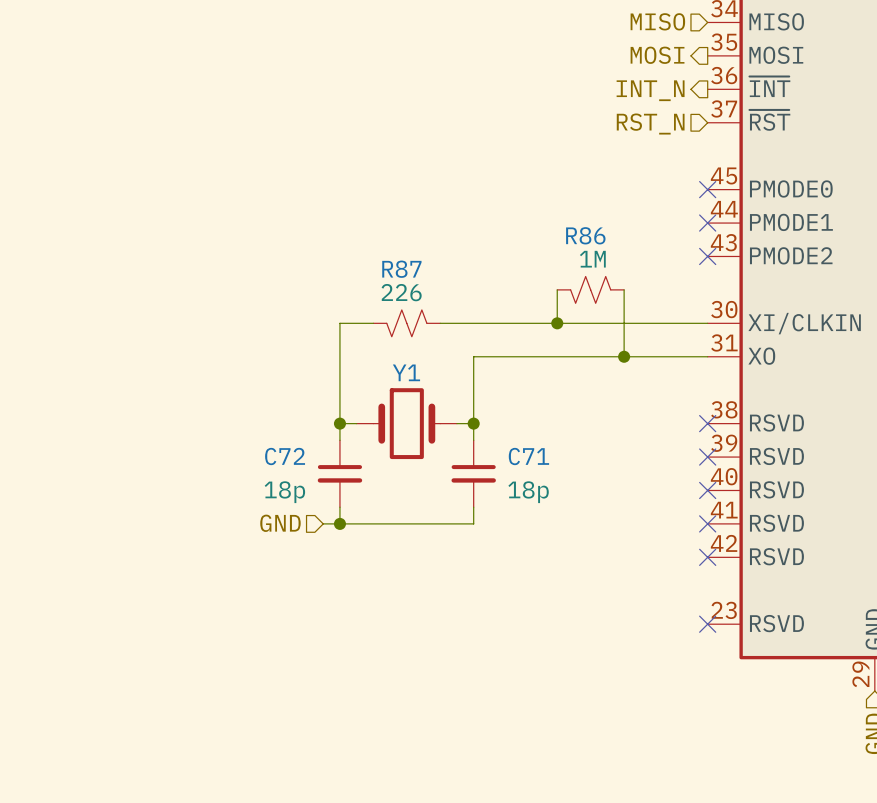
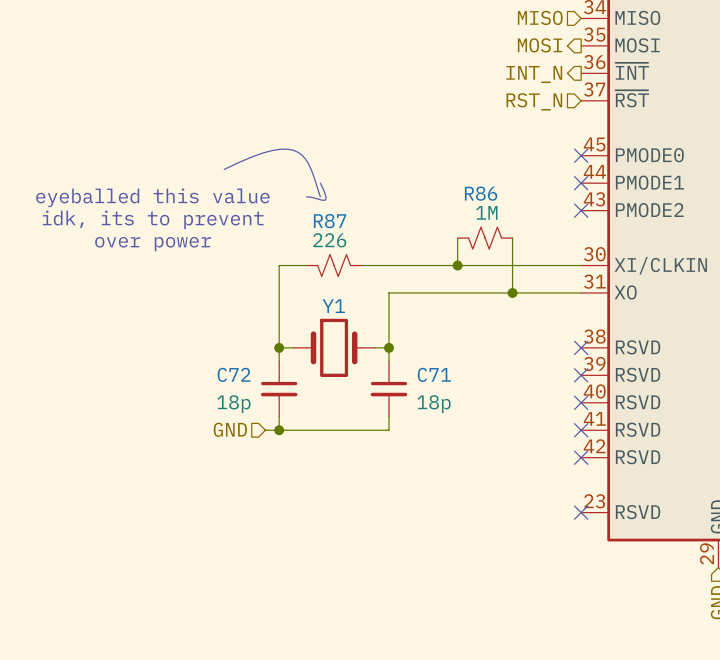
line: none -> (224, 169) (262, 153) (280, 149) (293, 150) (302, 155) (308, 163) (320, 196)
line: none -> (320, 183) (325, 199) (306, 196)
text: none -> eyeballed this value (152, 197)
text: none -> idk, its to prevent (153, 219)
text: none -> over power (153, 244)

